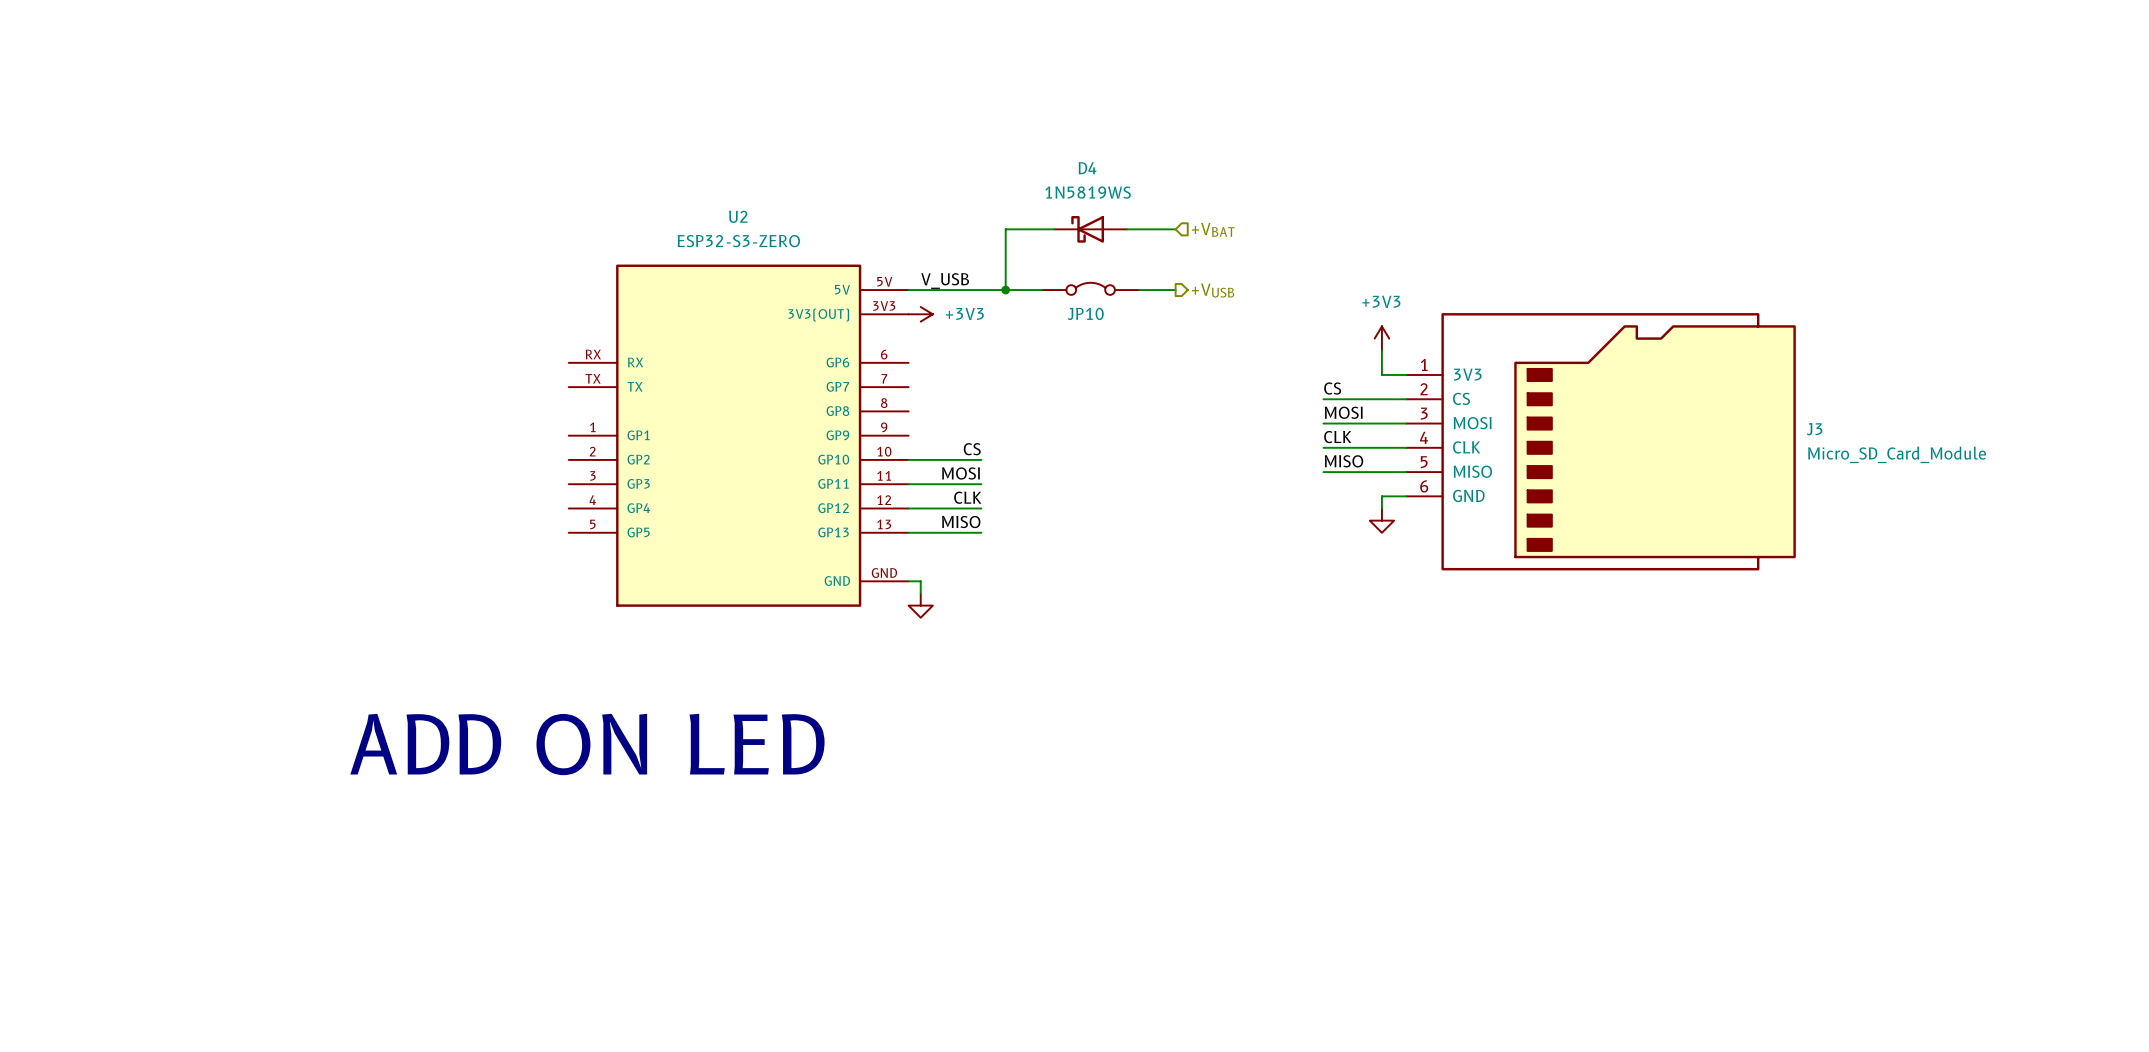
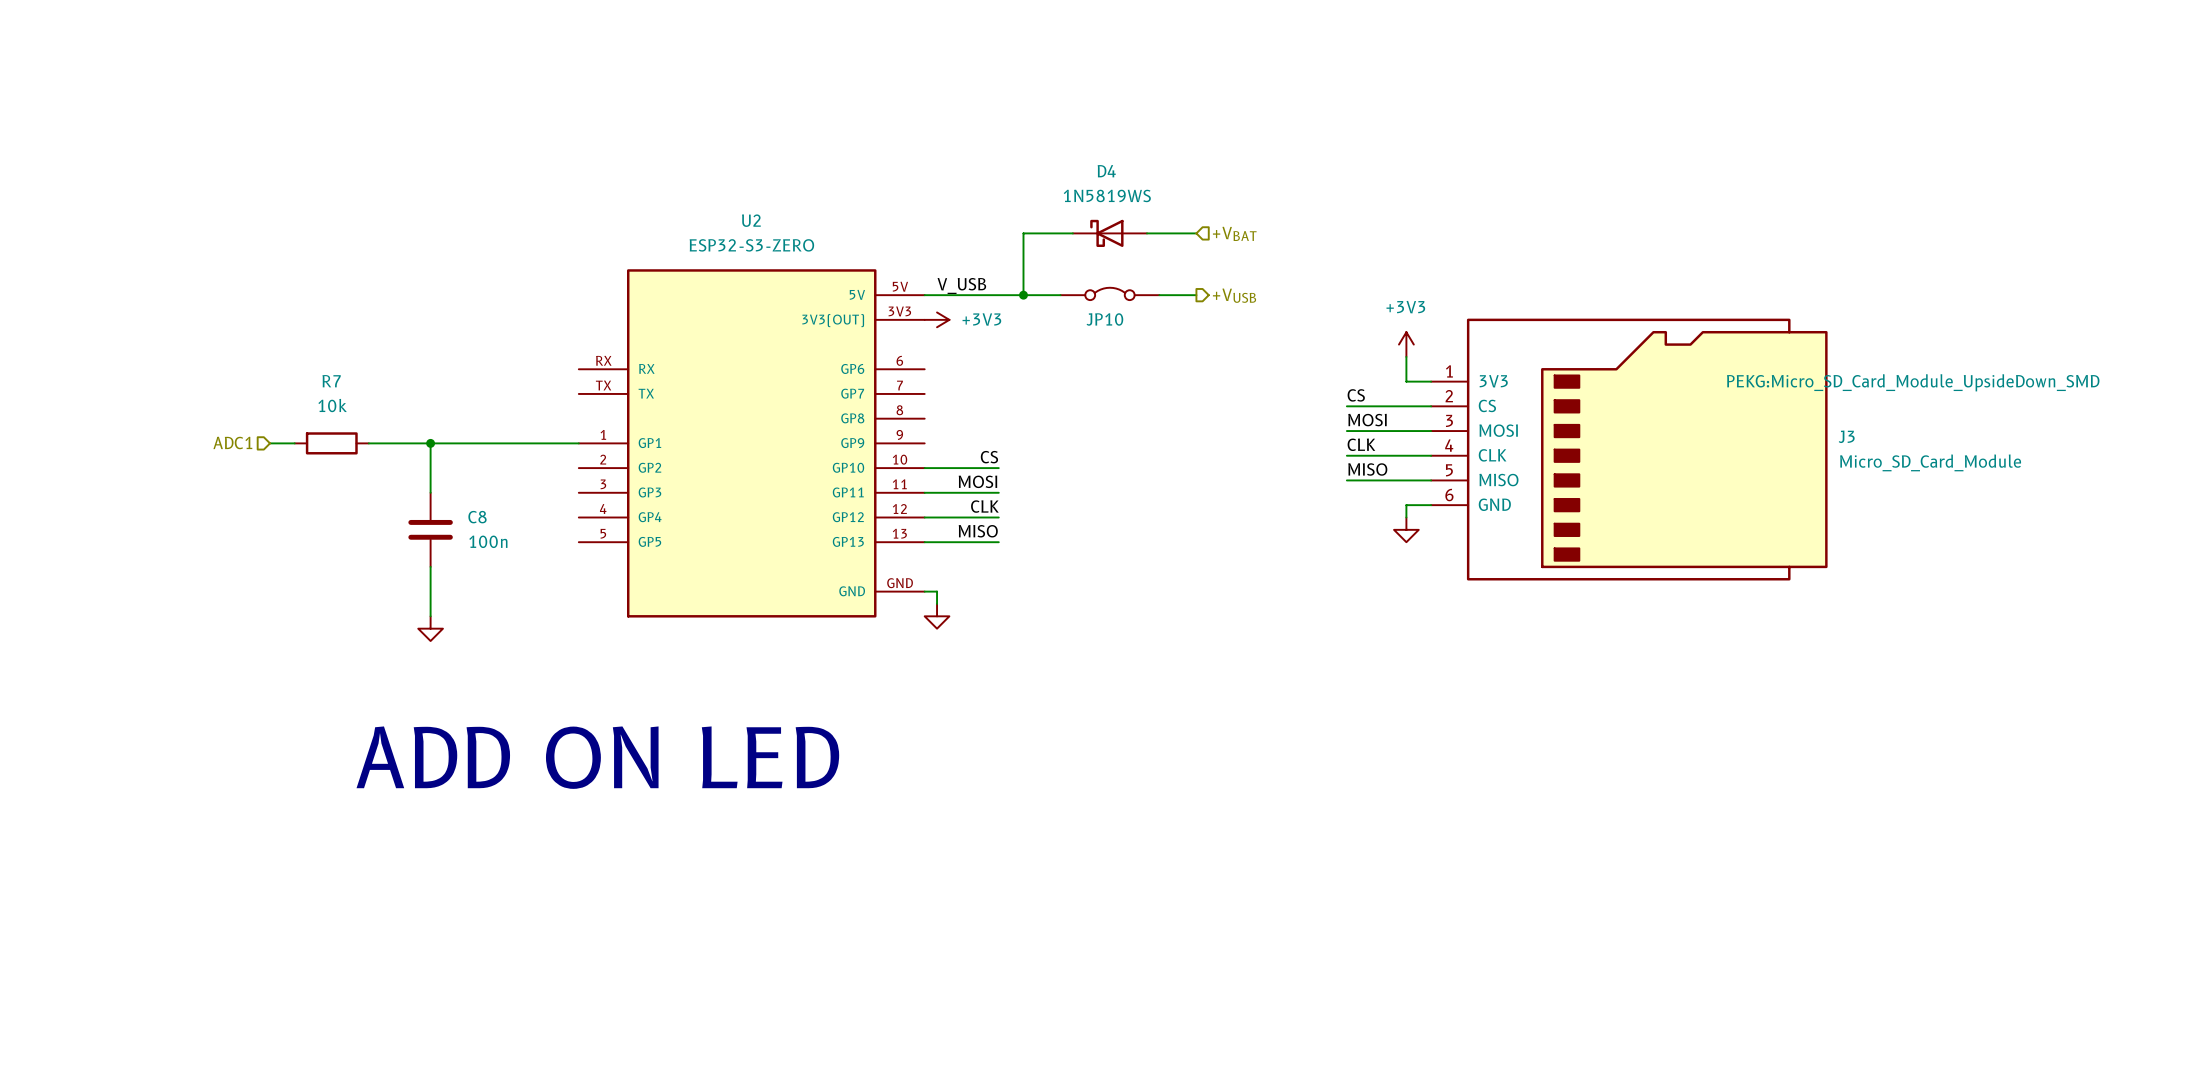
J3 text: none -> PEKG:Micro_SD_Card_Module_UpsideDown_SMD (1913, 382)
hierarchical label: none -> ADC1 (232, 442)
wire: none -> (270, 443) (294, 443)
R7: none -> 10k (331, 443)
wire: none -> (368, 443) (578, 443)
wire: none -> (430, 443) (430, 492)
junction: none -> (430, 443)
C8: none -> 100n (430, 529)
wire: none -> (430, 566) (430, 616)
power symbol: none -> (430, 628)

